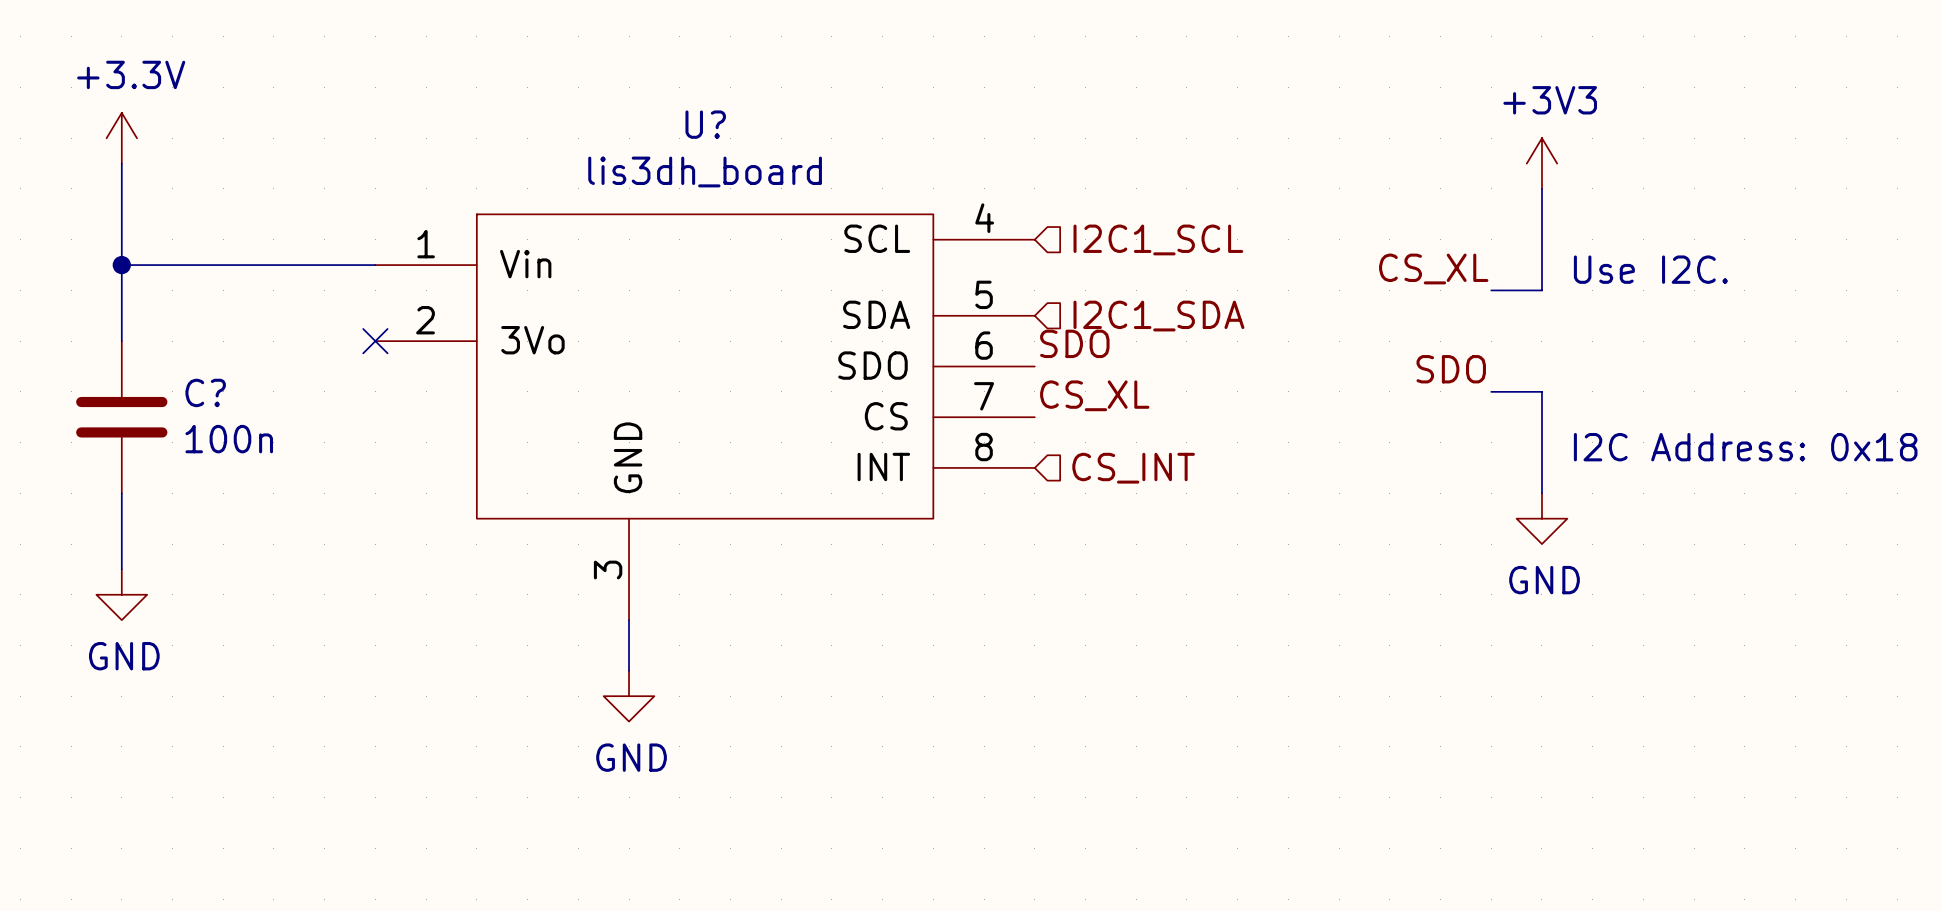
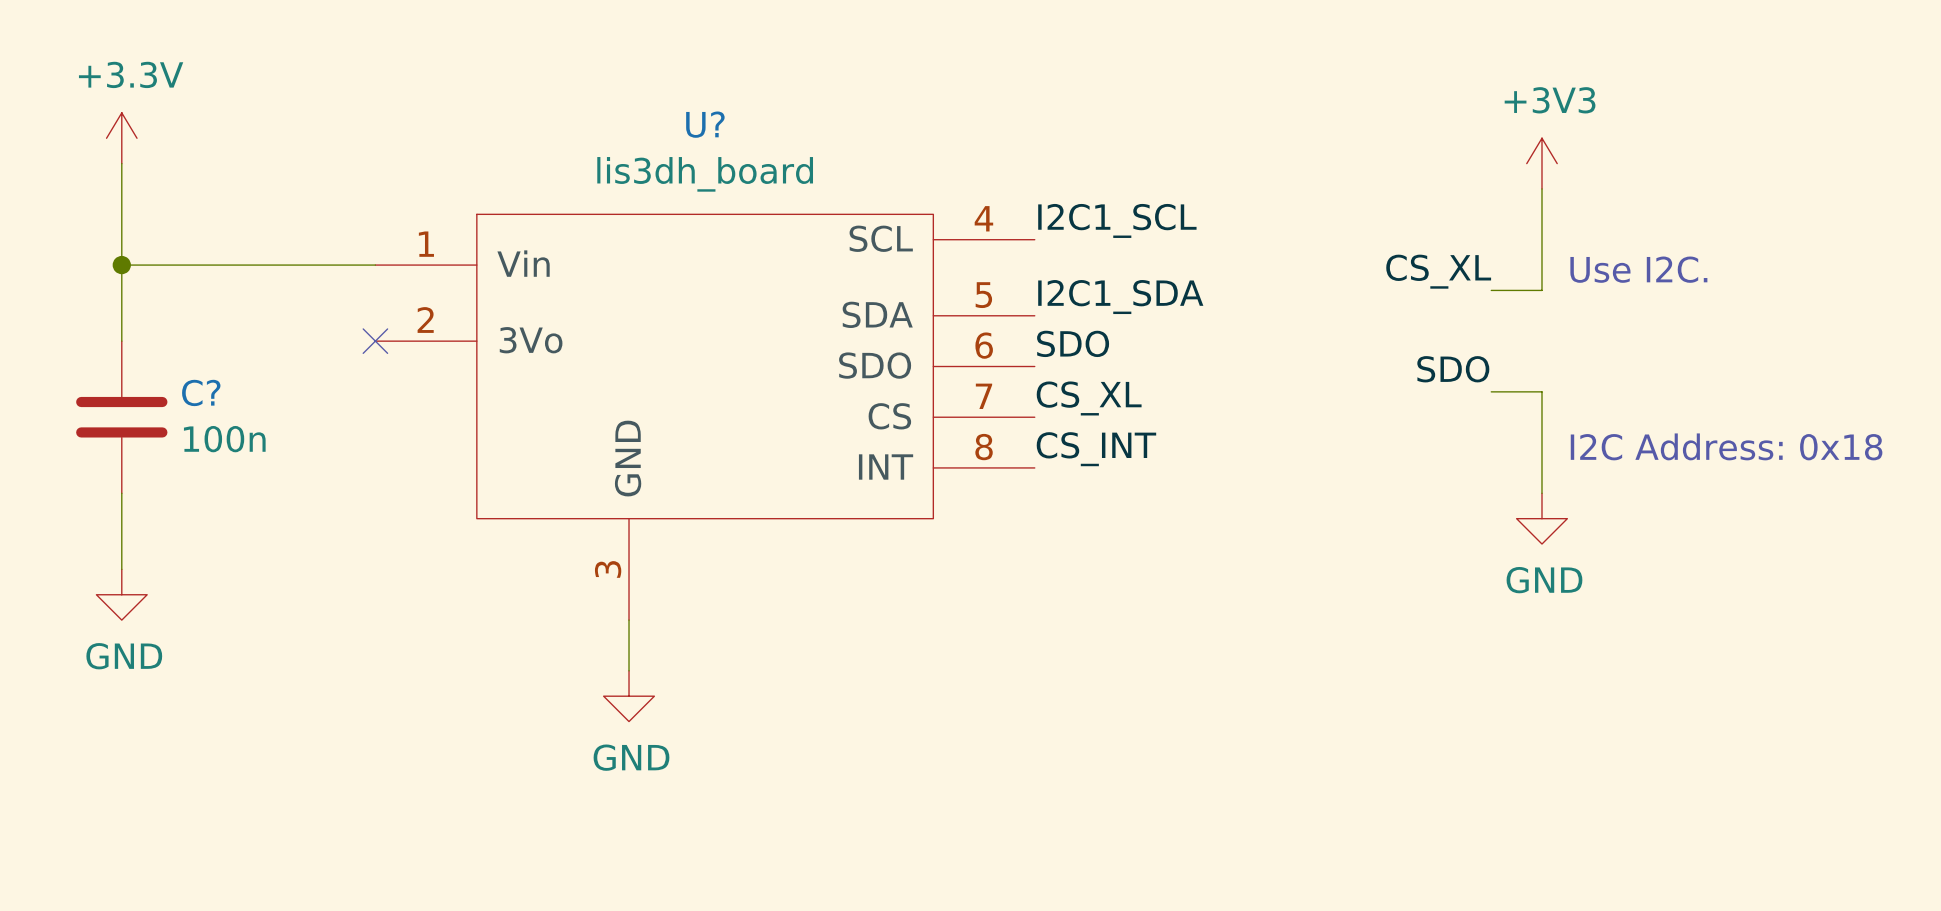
label: none -> I2C1_SCL (1117, 220)
hierarchical label: I2C1_SCL (1158, 239) -> none
label: none -> I2C1_SDA (1120, 297)
hierarchical label: I2C1_SDA (1158, 316) -> none
label: none -> CS_INT (1096, 449)
hierarchical label: CS_INT (1133, 468) -> none

